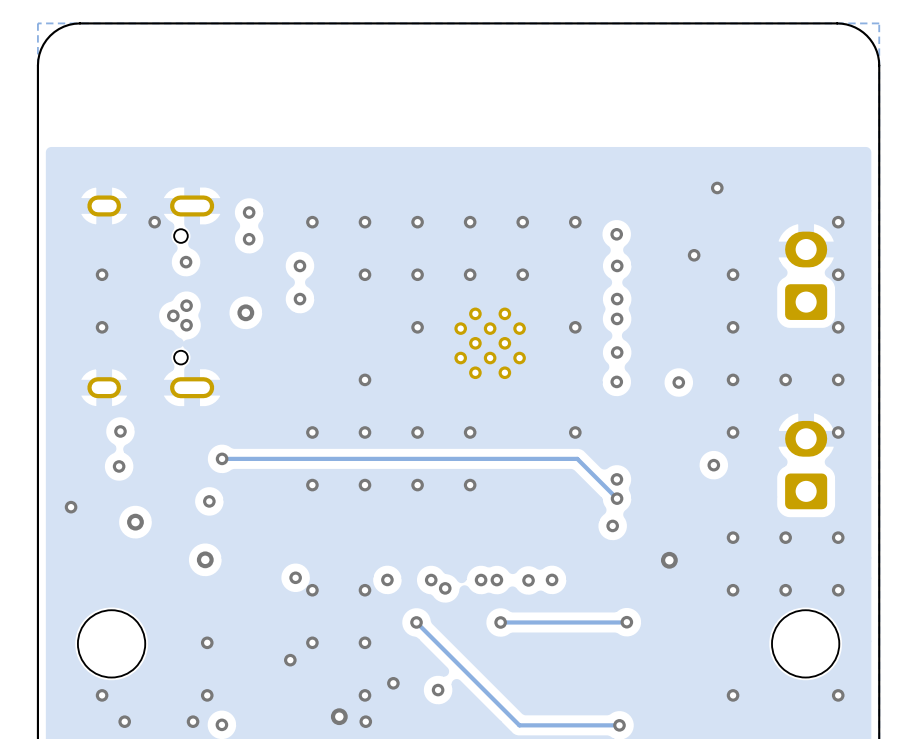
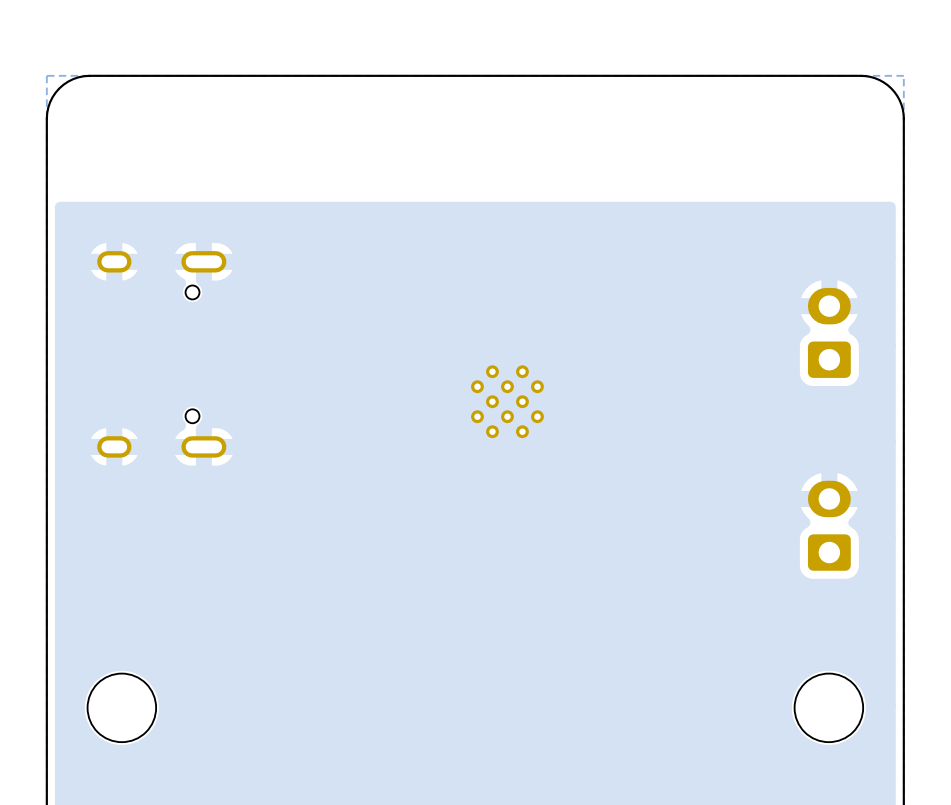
via: (717, 187) -> none
via: (249, 212) -> none
via: (154, 222) -> none
via: (312, 222) -> none
via: (364, 222) -> none
via: (417, 222) -> none
via: (470, 222) -> none
via: (522, 222) -> none
via: (575, 222) -> none
via: (838, 222) -> none
via: (616, 234) -> none
via: (249, 239) -> none
via: (694, 255) -> none
via: (186, 262) -> none
via: (299, 265) -> none
via: (617, 265) -> none
via: (102, 274) -> none
via: (364, 274) -> none
via: (417, 274) -> none
via: (470, 274) -> none
via: (522, 274) -> none
via: (733, 274) -> none
via: (838, 274) -> none
via: (300, 299) -> none
via: (617, 299) -> none
via: (186, 305) -> none
via: (245, 312) -> none
via: (173, 315) -> none
via: (617, 318) -> none
via: (186, 325) -> none
via: (102, 327) -> none
via: (417, 327) -> none
via: (575, 327) -> none
via: (733, 327) -> none
via: (838, 327) -> none
via: (617, 352) -> none
via: (364, 379) -> none
via: (733, 379) -> none
via: (785, 379) -> none
via: (838, 379) -> none
via: (616, 381) -> none
via: (678, 382) -> none
via: (120, 431) -> none
via: (312, 432) -> none
via: (364, 432) -> none
via: (417, 432) -> none
via: (470, 432) -> none
via: (575, 432) -> none
via: (733, 432) -> none
via: (838, 432) -> none
track: (222, 458) (577, 458) (617, 498) -> none
via: (222, 458) -> none
via: (713, 465) -> none
via: (119, 466) -> none
via: (616, 479) -> none
via: (312, 485) -> none
via: (364, 485) -> none
via: (417, 485) -> none
via: (470, 485) -> none
via: (617, 498) -> none
via: (209, 501) -> none
via: (71, 507) -> none
via: (135, 522) -> none
via: (612, 525) -> none
via: (733, 537) -> none
via: (785, 537) -> none
via: (838, 537) -> none
via: (205, 559) -> none
via: (669, 560) -> none
via: (295, 577) -> none
via: (387, 579) -> none
via: (552, 579) -> none
via: (431, 580) -> none
via: (481, 580) -> none
via: (496, 580) -> none
via: (528, 580) -> none
via: (445, 588) -> none
via: (312, 590) -> none
via: (364, 590) -> none
via: (733, 590) -> none
via: (785, 590) -> none
via: (838, 590) -> none
track: (416, 622) (519, 725) (619, 725) -> none
via: (416, 622) -> none
via: (500, 622) -> none
track: (626, 622) (500, 622) -> none
via: (626, 622) -> none
via: (207, 642) -> none
via: (312, 642) -> none
via: (364, 642) -> none
via: (290, 660) -> none
via: (393, 683) -> none
via: (438, 690) -> none
via: (102, 695) -> none
via: (207, 695) -> none
via: (364, 695) -> none
via: (733, 695) -> none
via: (838, 695) -> none
via: (339, 716) -> none
via: (124, 721) -> none
via: (193, 721) -> none
via: (365, 721) -> none
via: (221, 724) -> none
via: (619, 725) -> none

